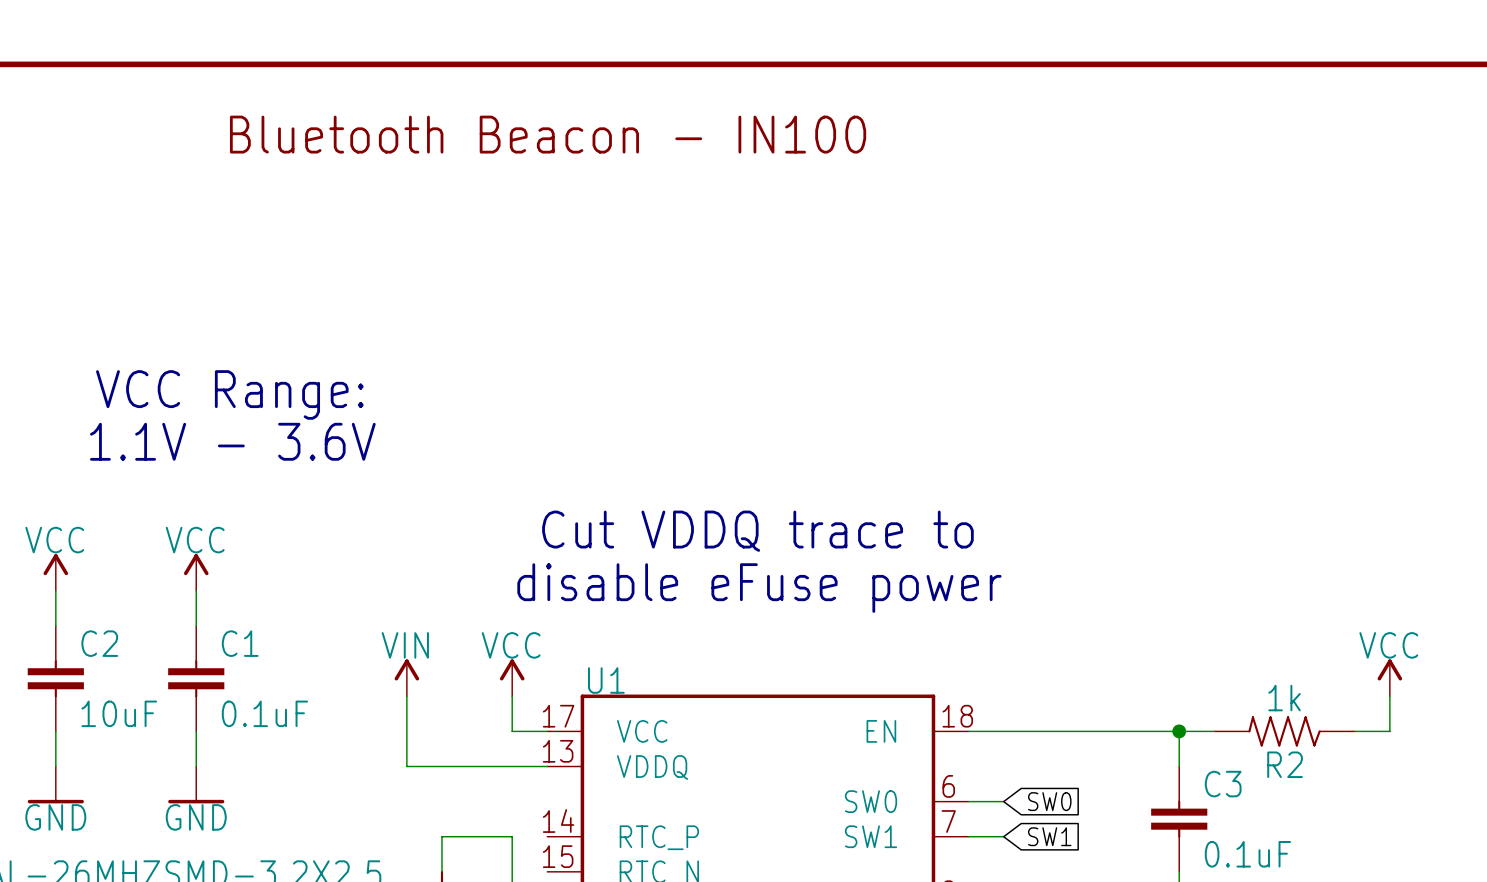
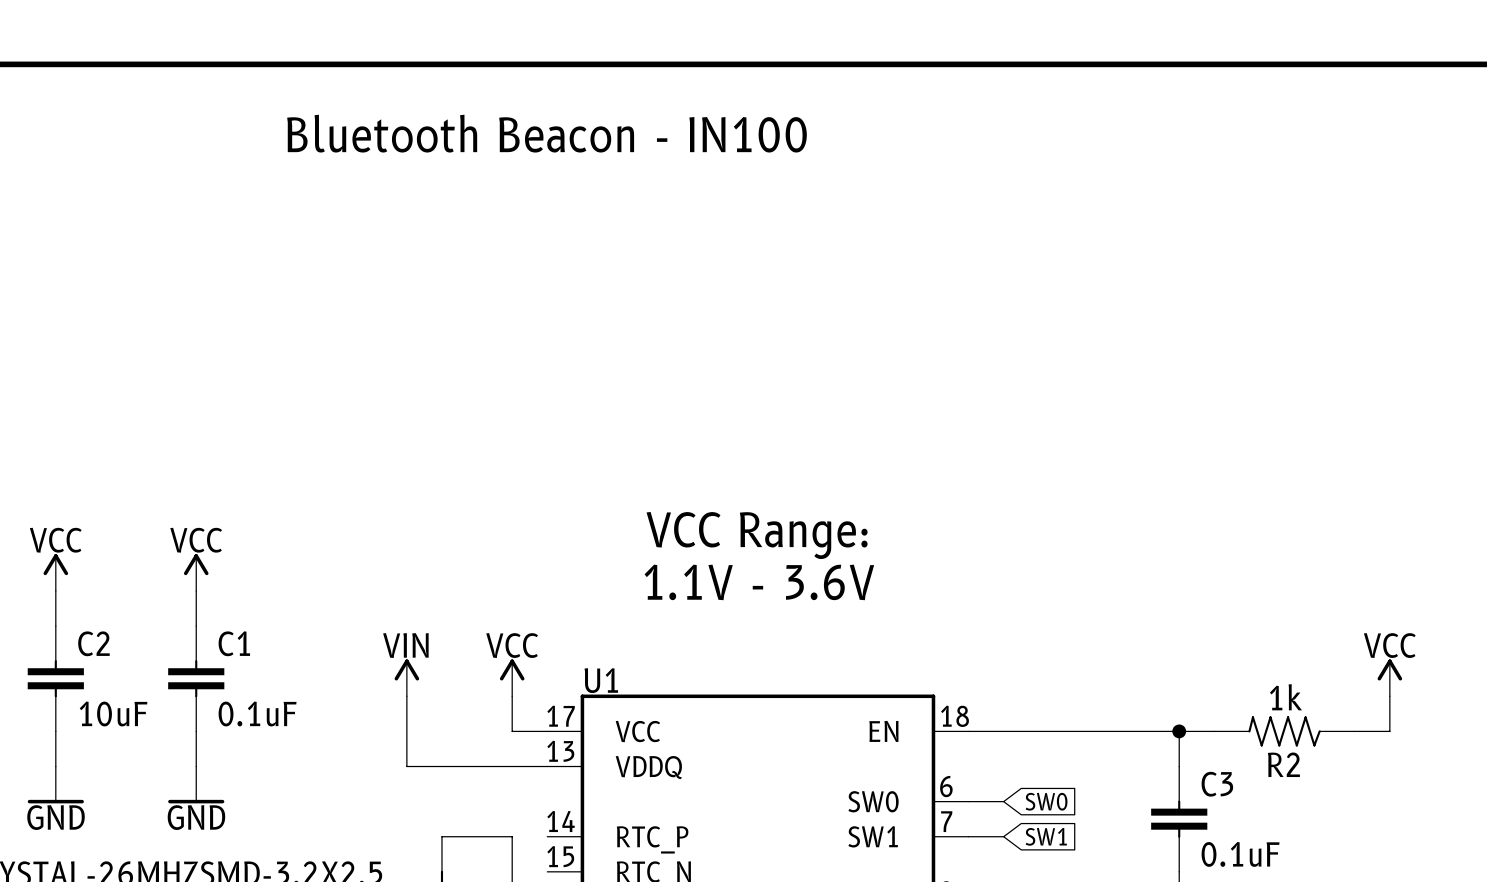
text: VCC Range: (229, 394) -> none
text: 1.1V - 3.6V (232, 441) -> none
text: Cut VDDQ trace to (757, 531) -> VCC Range: (757, 535)
text: disable eFuse power (759, 588) -> 1.1V - 3.6V (759, 582)

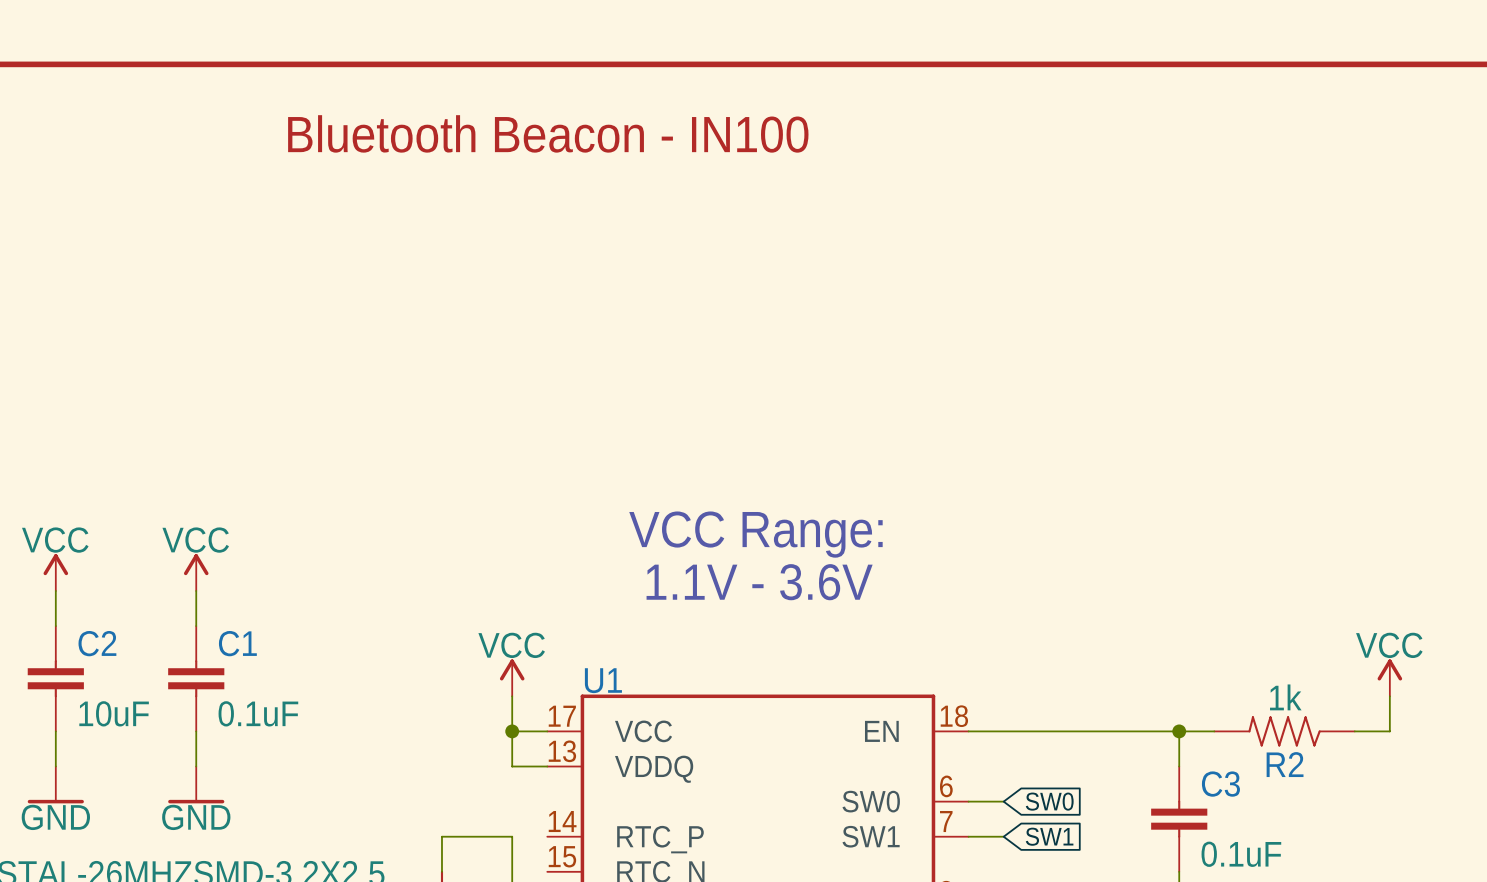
power symbol: VIN (406, 677) -> none
wire: (406, 696) (406, 766) (512, 766) -> (512, 731) (512, 766)
junction: none -> (512, 731)

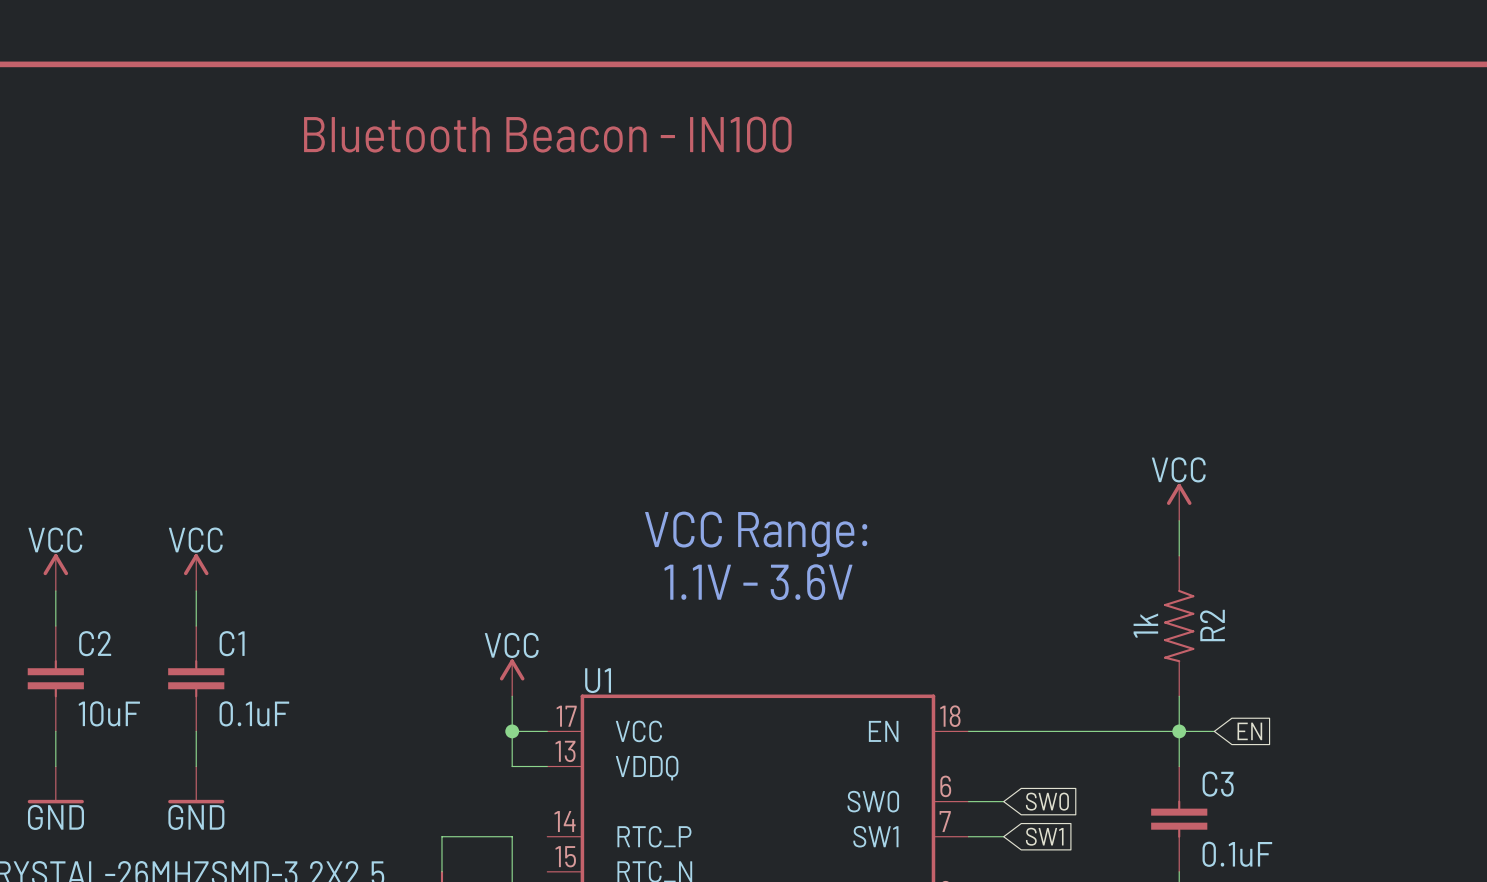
wire: none -> (1179, 520) (1179, 555)
power symbol position: VCC (1389, 677) -> VCC (1179, 502)
wire: none -> (1179, 696) (1179, 731)
wire: (1389, 696) (1389, 731) (1354, 731) -> none
global label: none -> EN (1249, 731)
R2 rotation: 0° (1284, 731) -> 90° counterclockwise (1179, 626)
R2 position: (1284, 731) -> (1179, 626)

